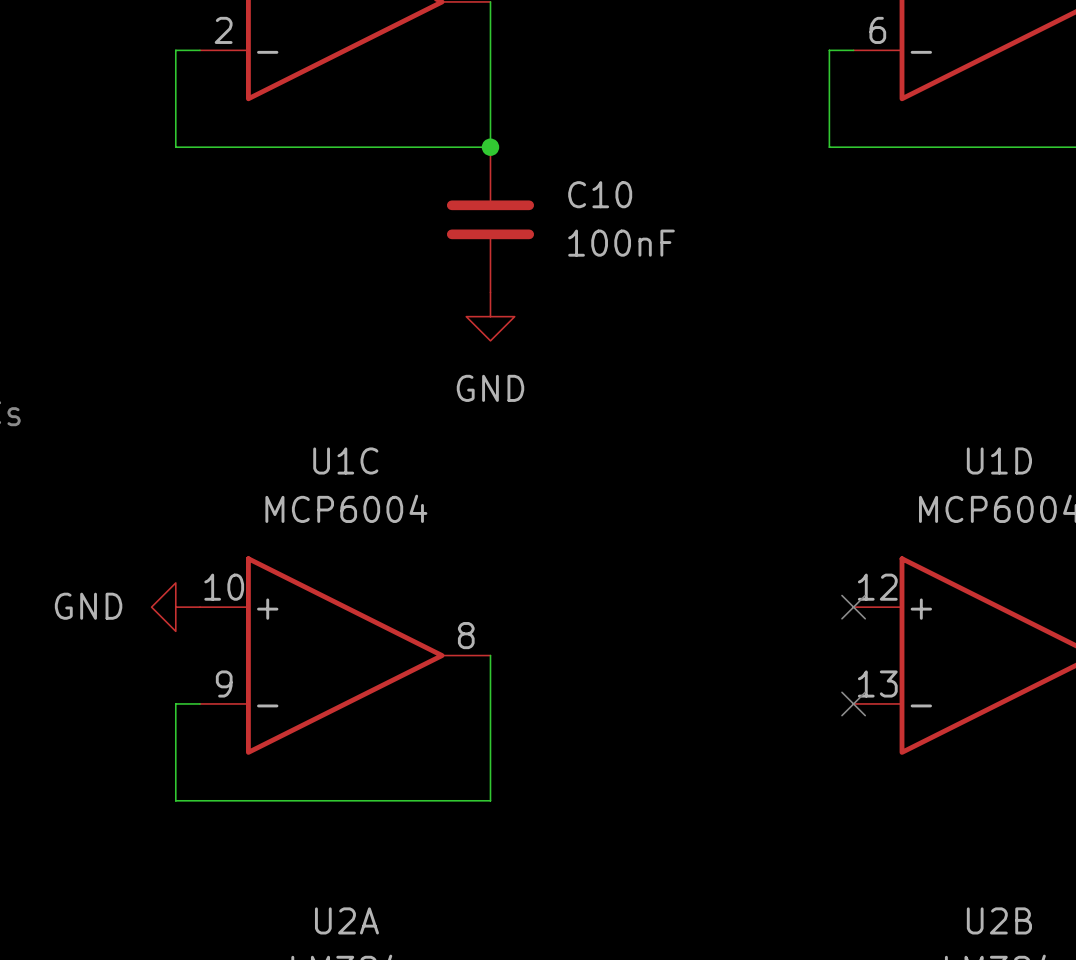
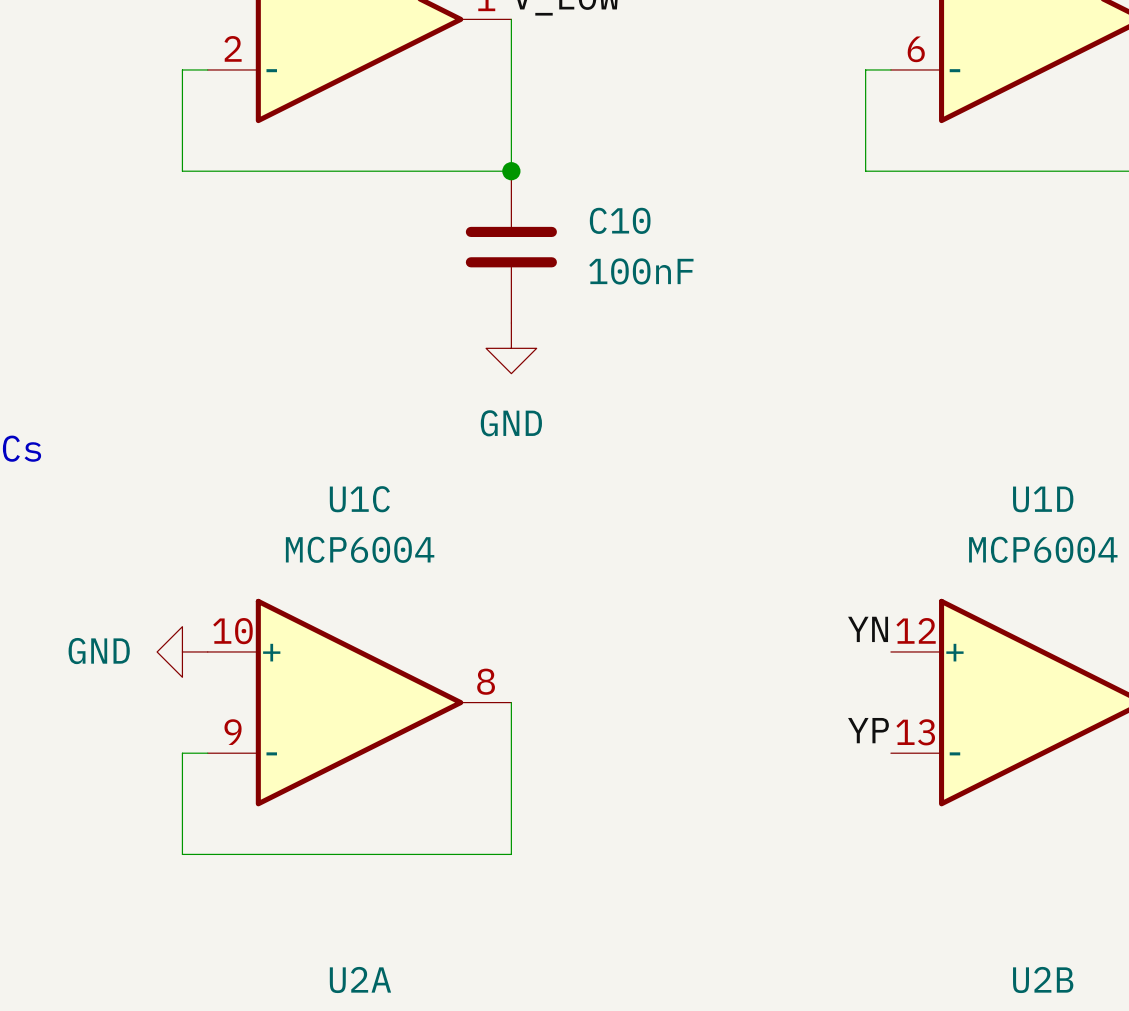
label: none -> YN (868, 629)
no-connect mark: (853, 607) -> none
label: none -> YP (868, 730)
no-connect mark: (853, 703) -> none

